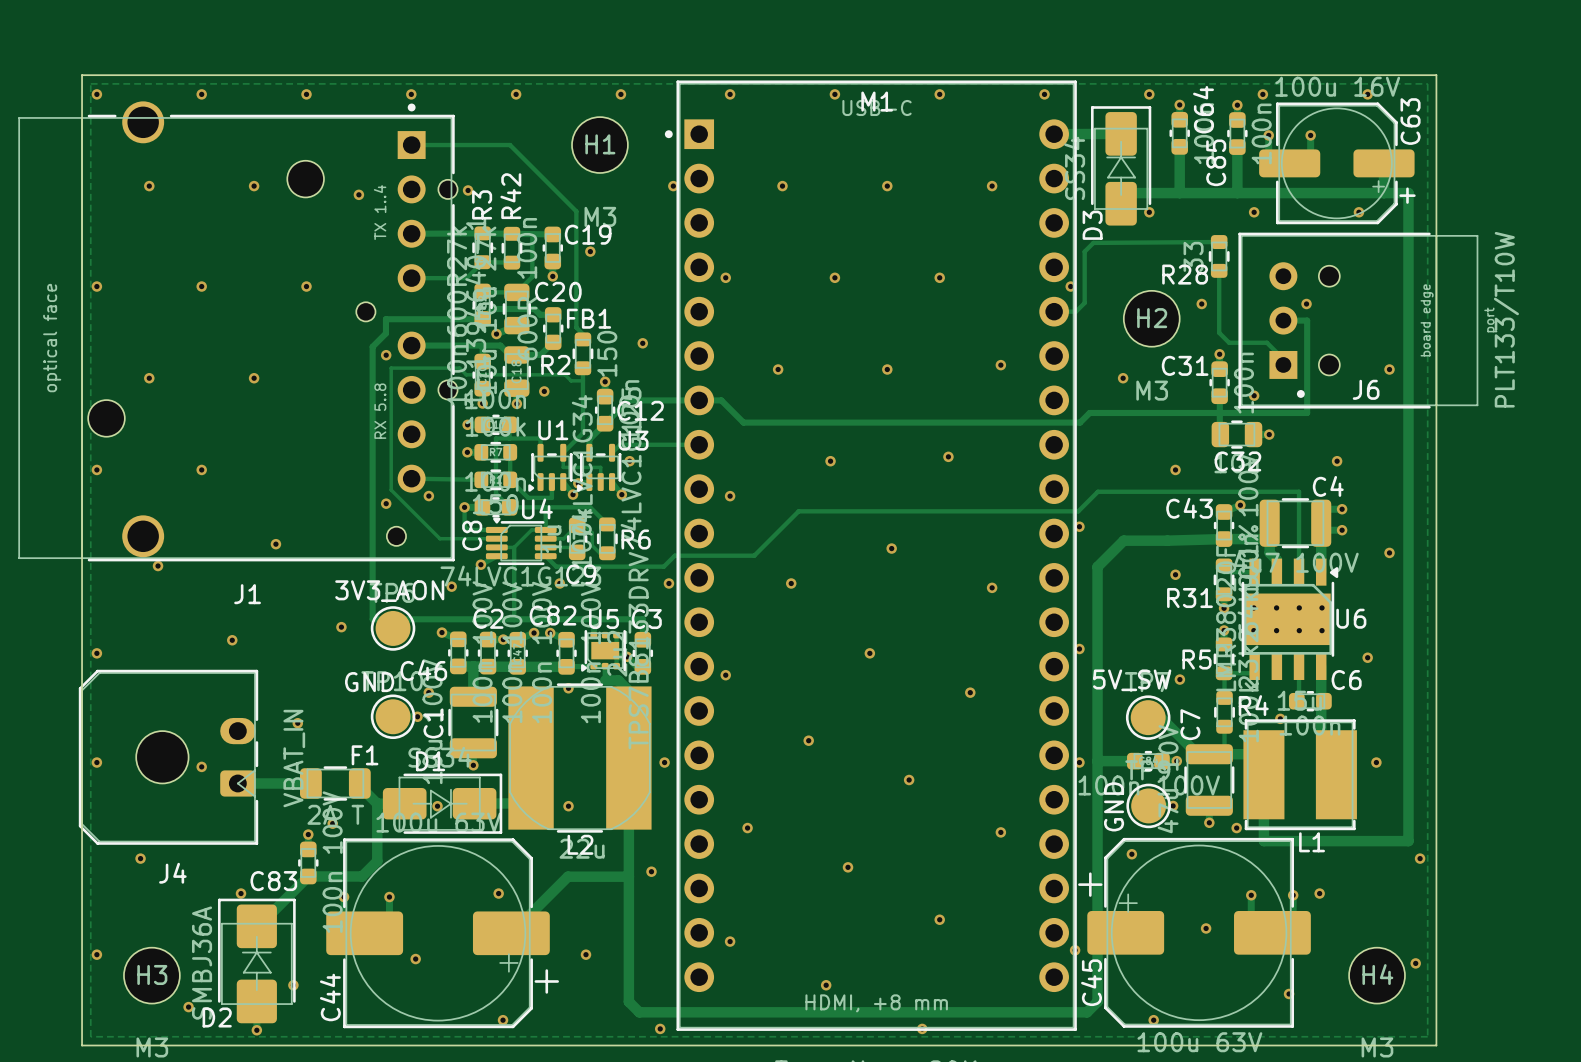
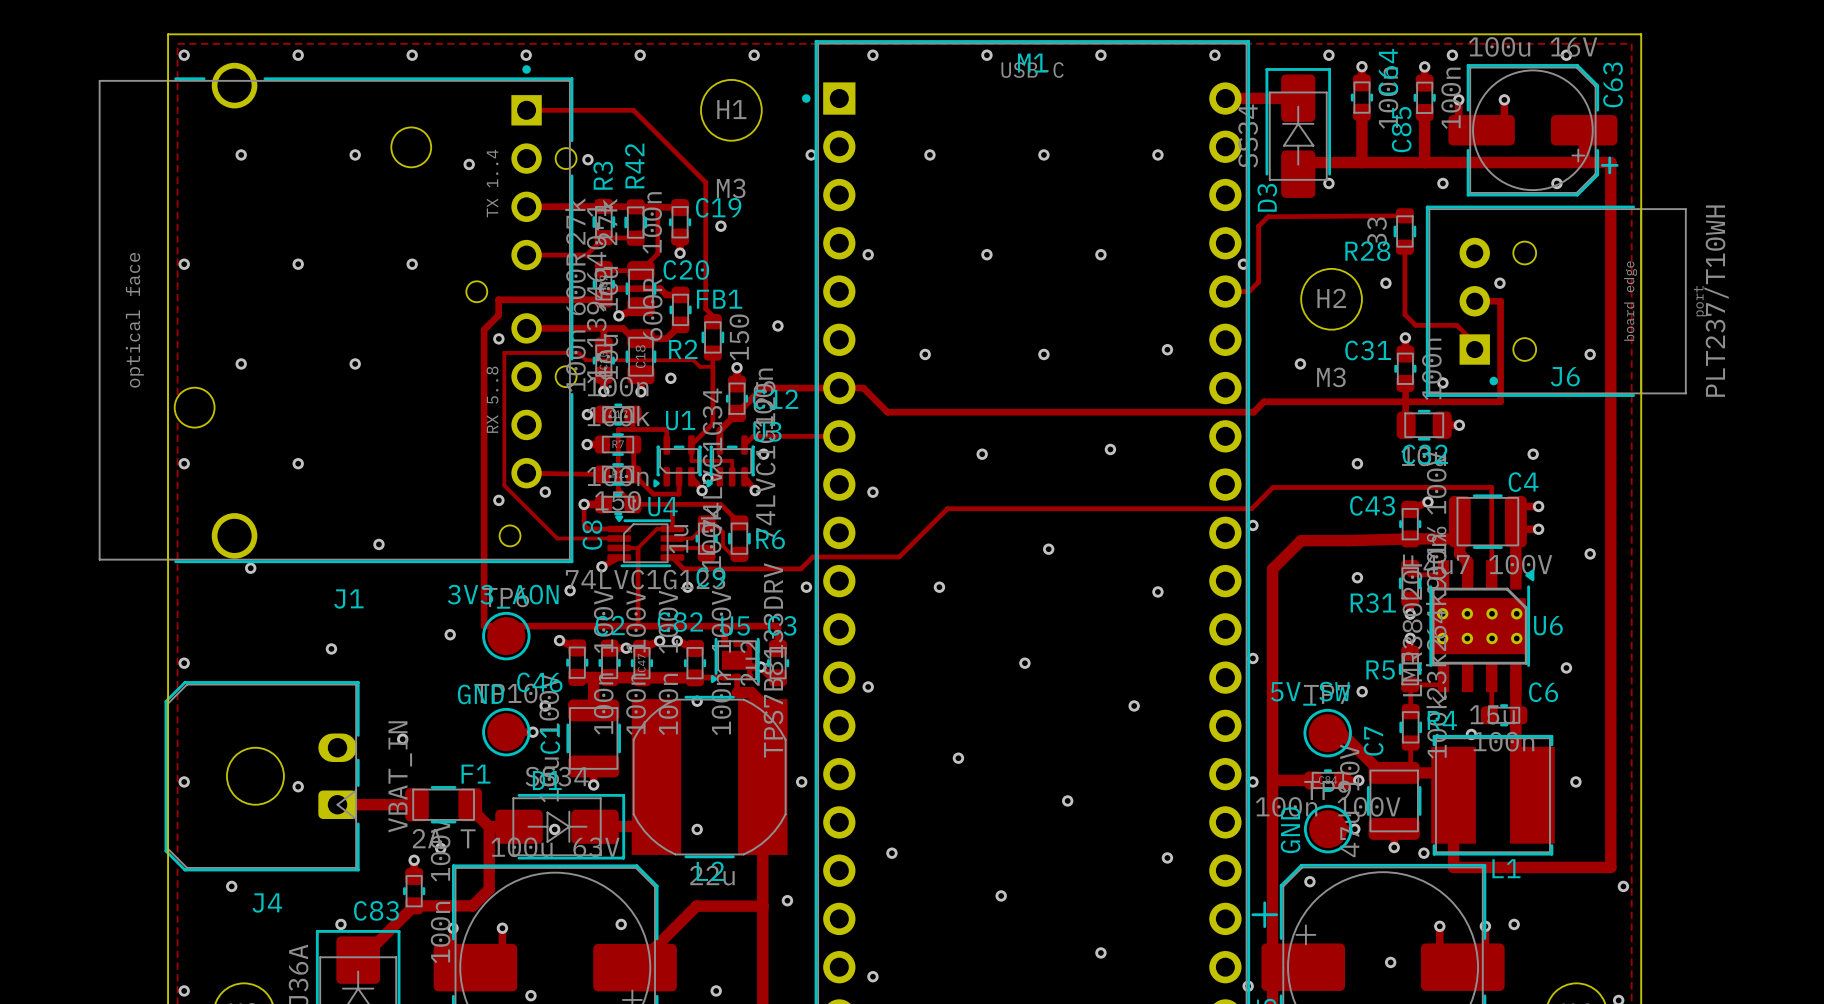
J6 value: PLT133/T10W (1506, 319) -> PLT237/T10WH (1716, 301)

